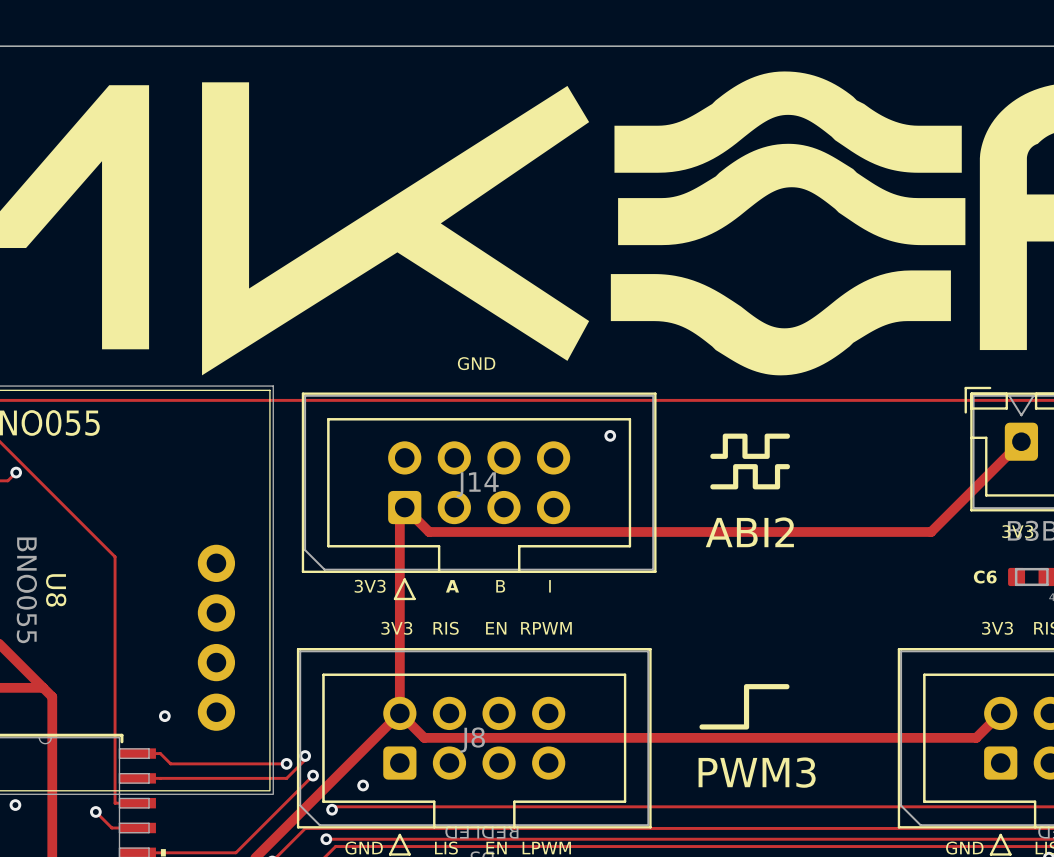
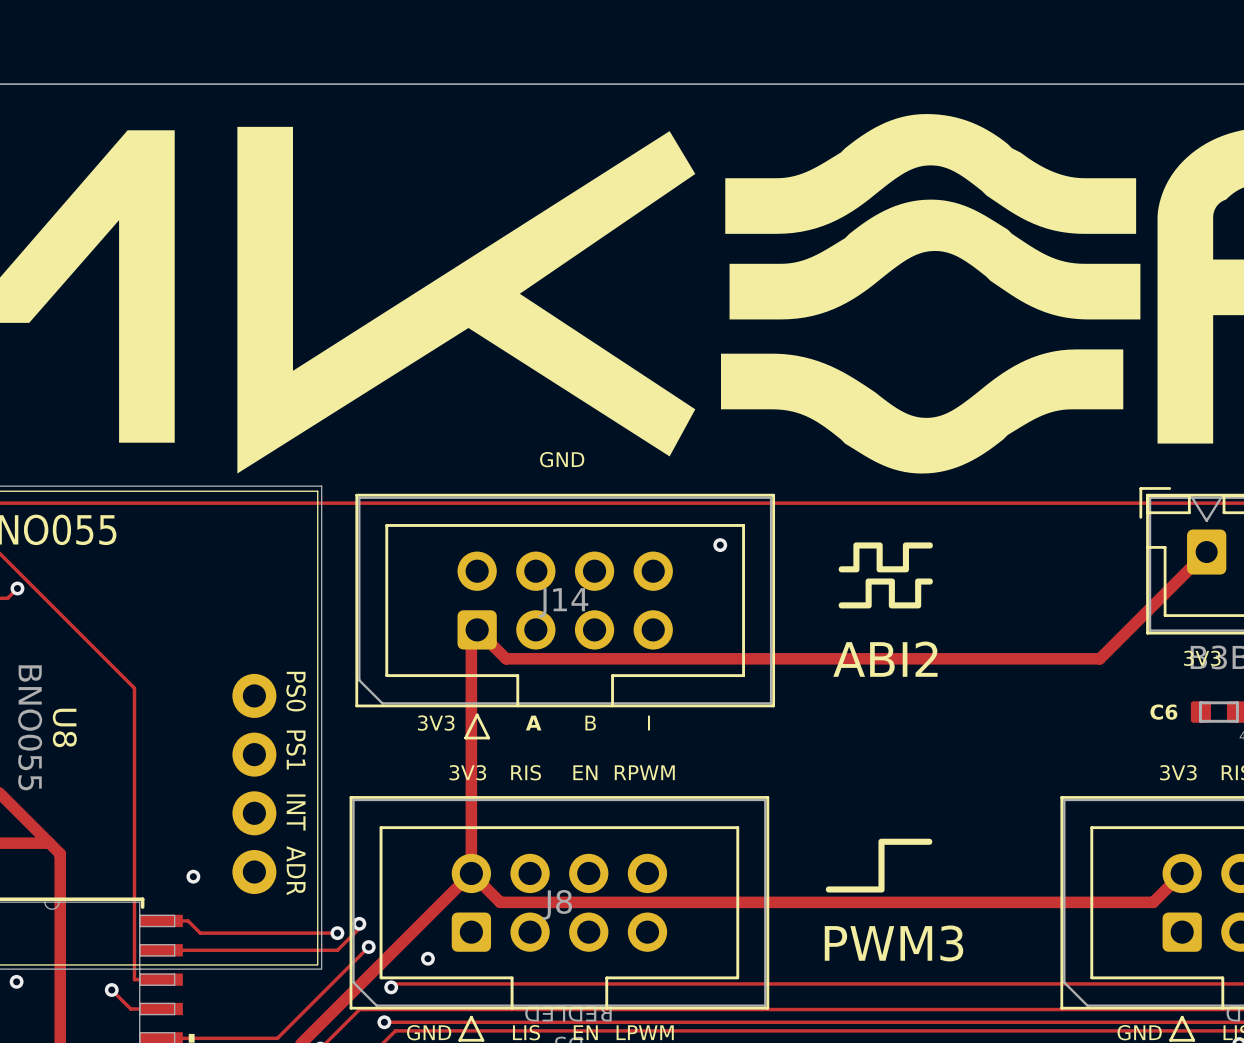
U8 text: none -> PS0 (296, 691)
U8 text: none -> PS1 (296, 750)
U8 text: none -> INT (296, 812)
U8 text: none -> ADR (296, 870)

